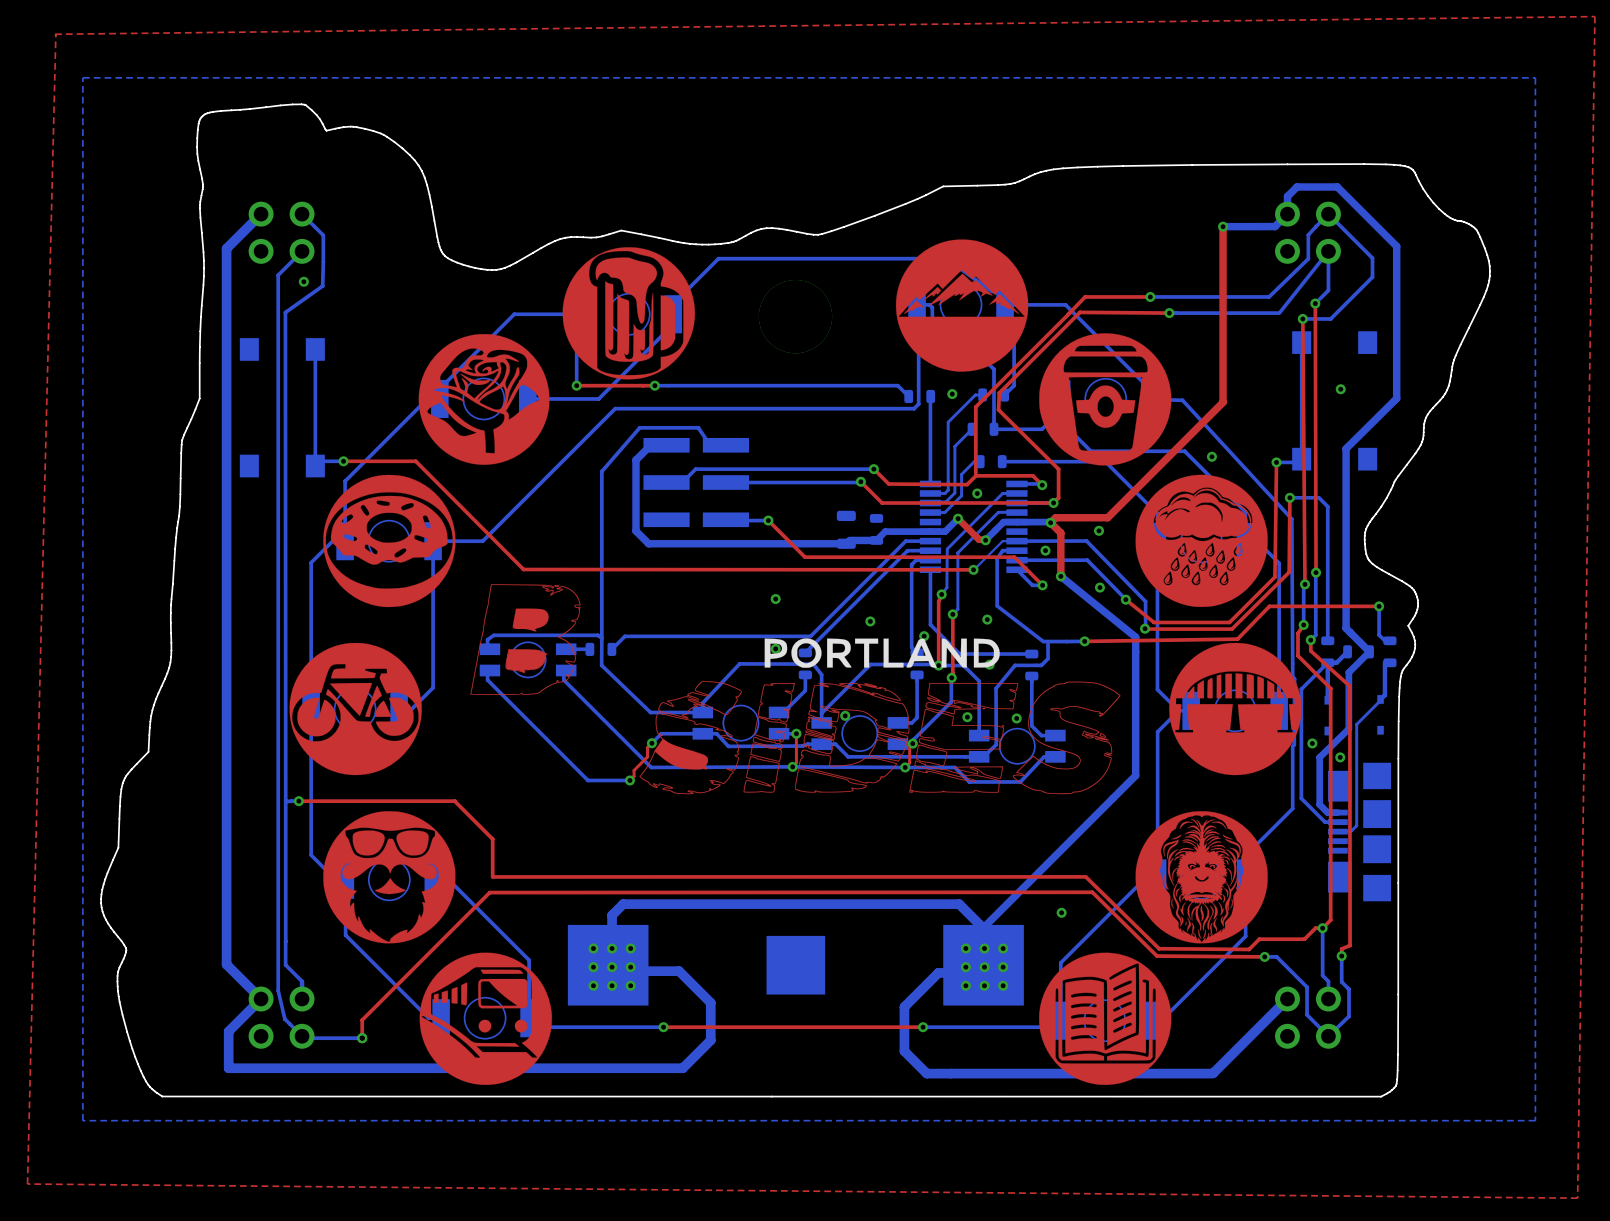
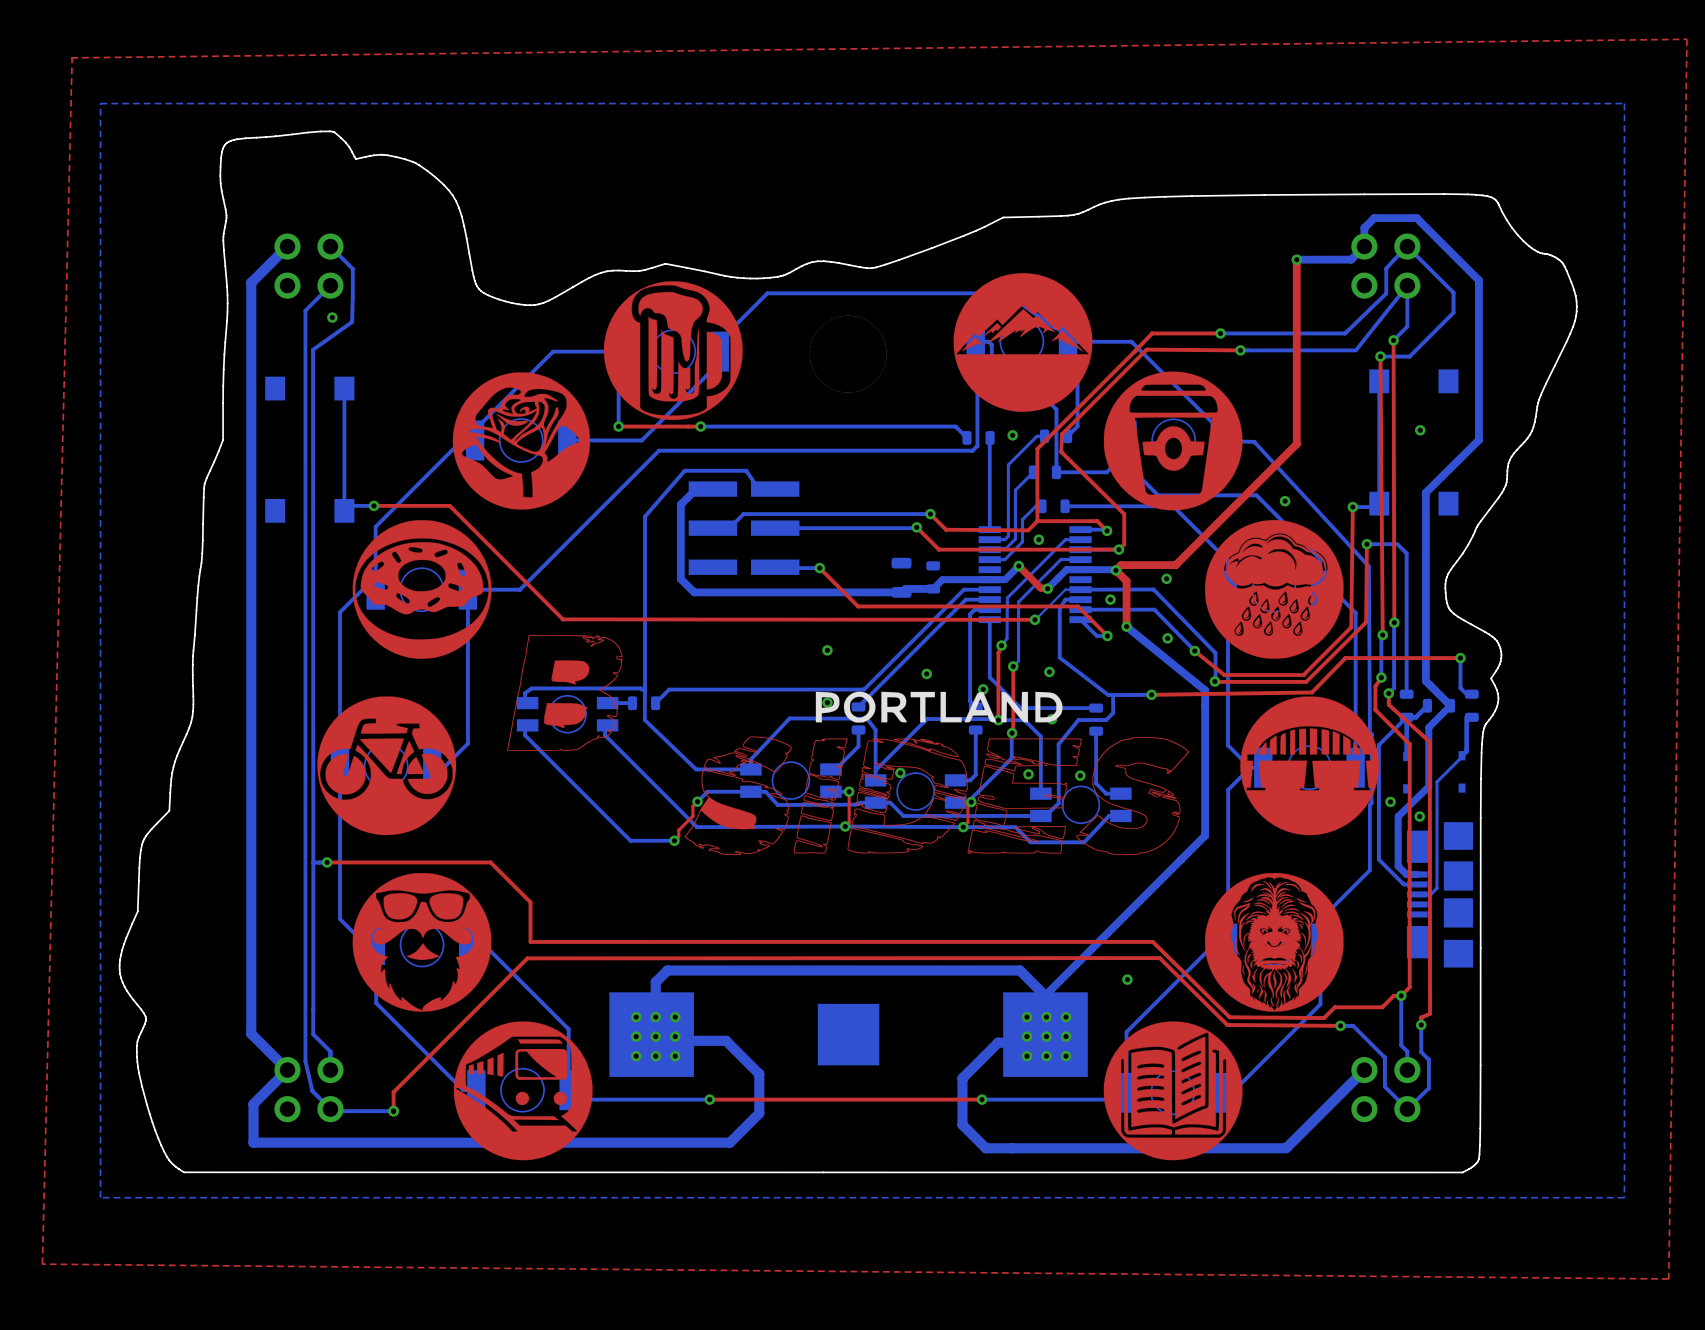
drawing shape: [289, 239, 1302, 1085] -> [317, 273, 1380, 1161]

